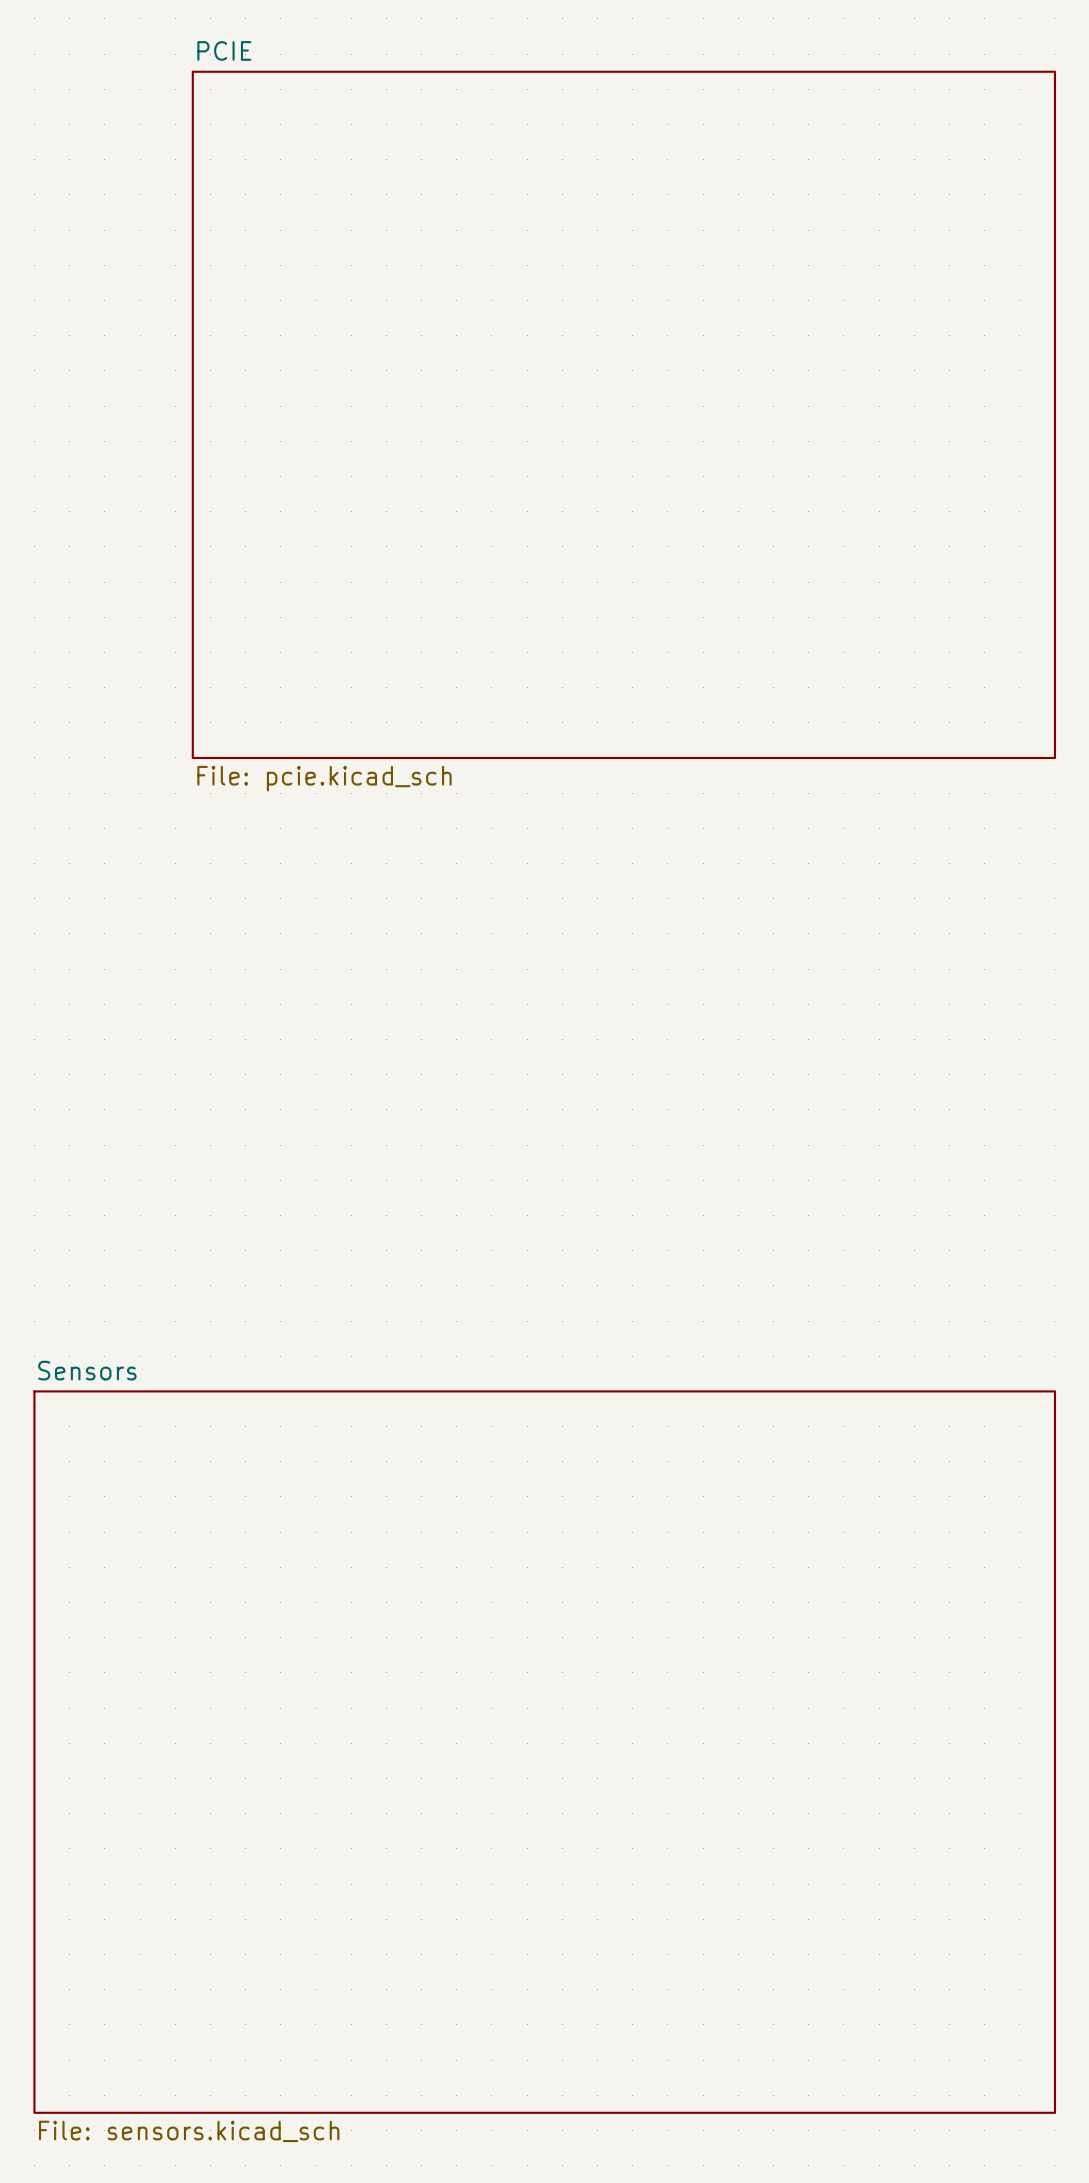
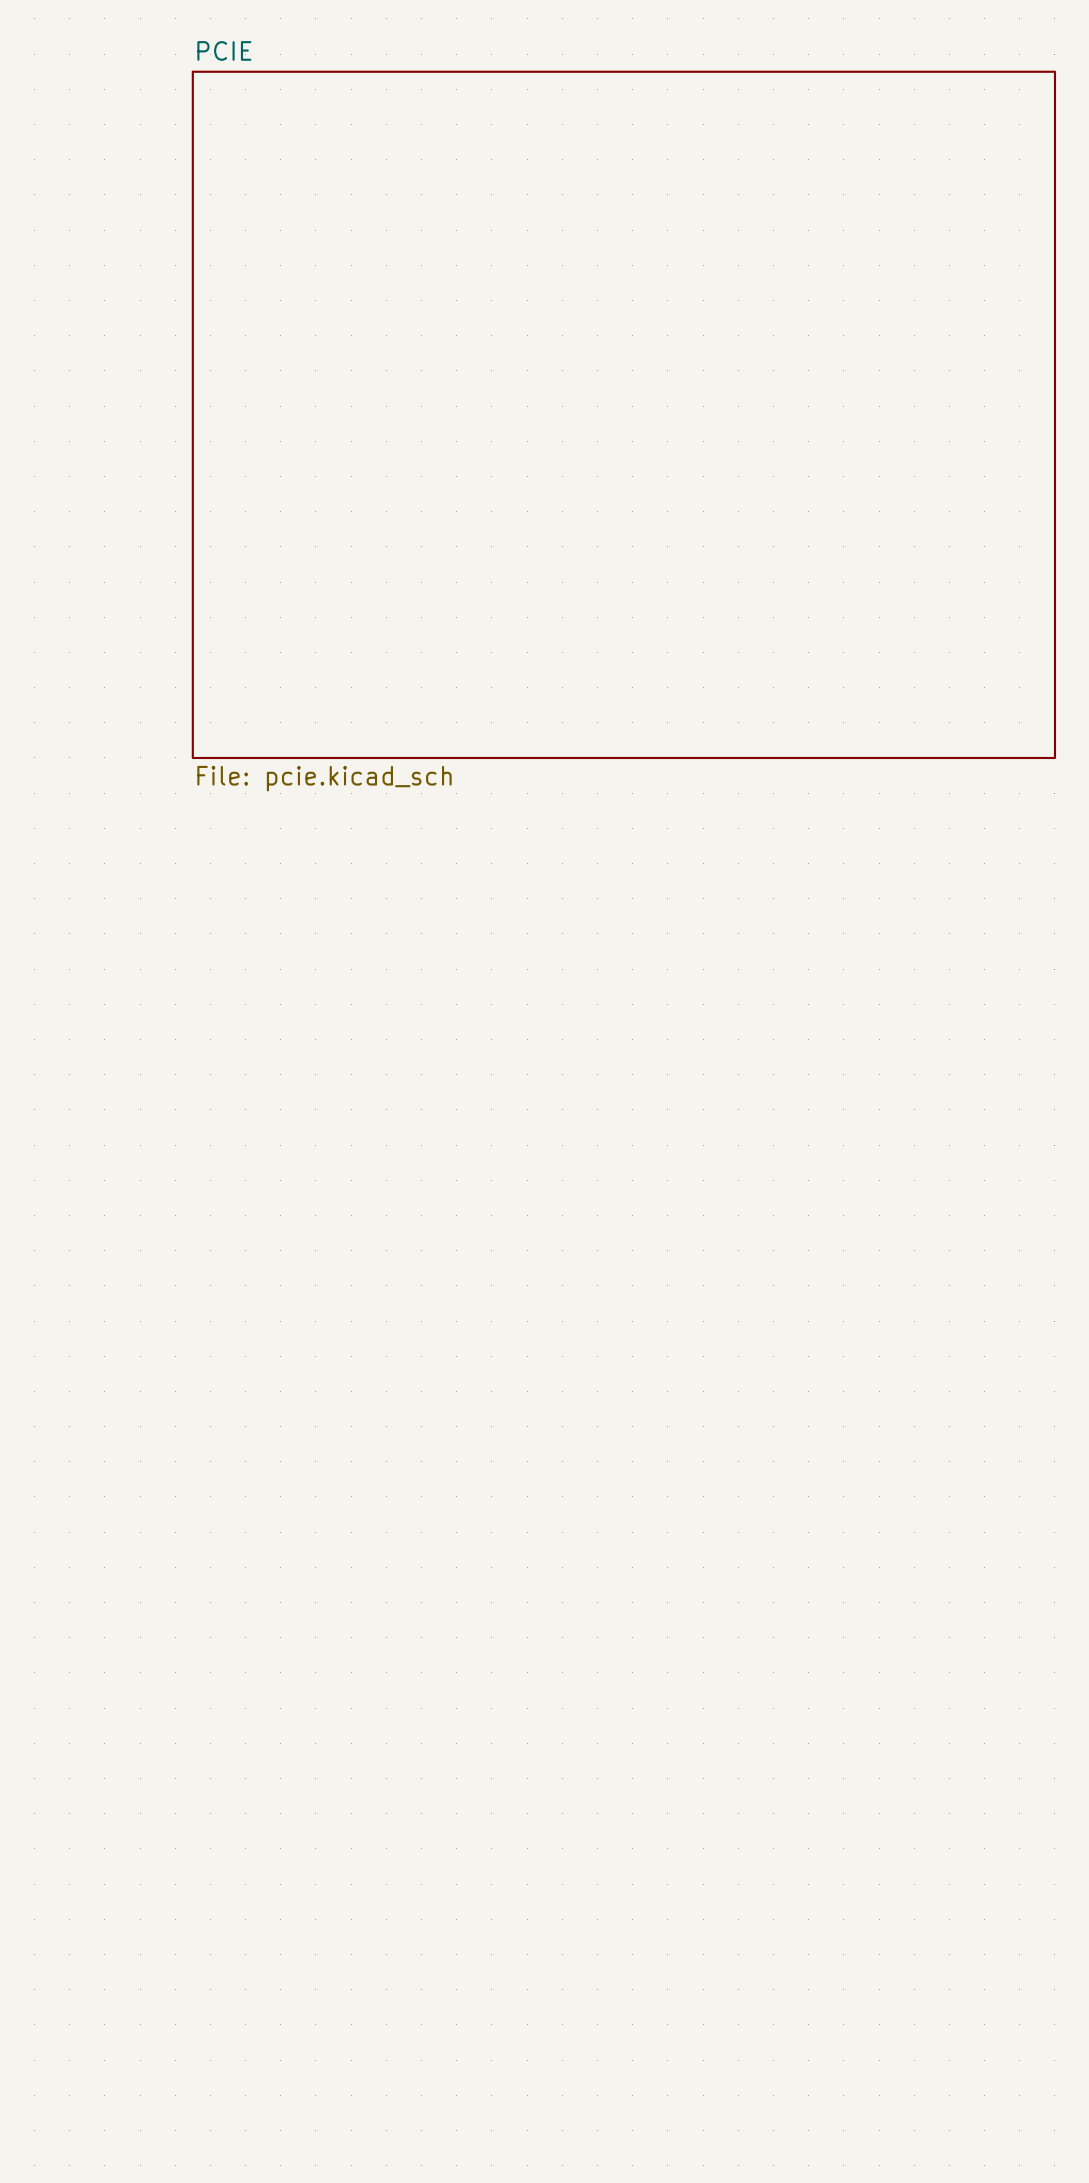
sheet Sensors: File: sensors.kicad_sch (544, 1752) -> none

